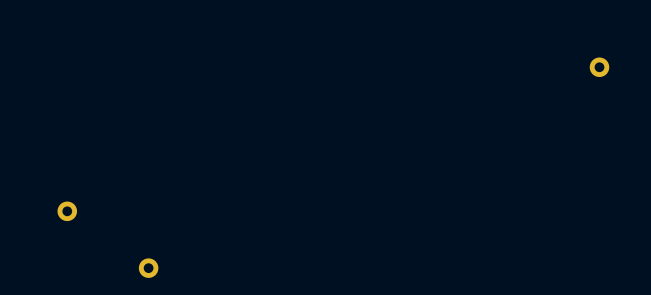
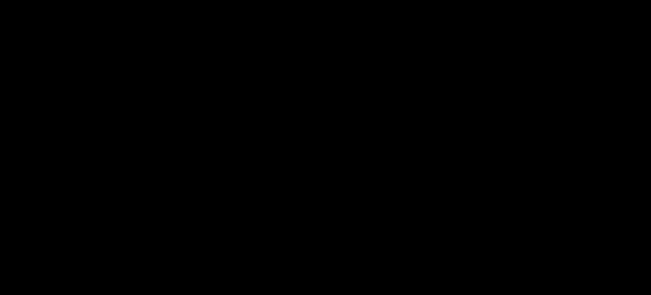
part: (599, 67) -> none
part: (67, 211) -> none
part: (148, 268) -> none

